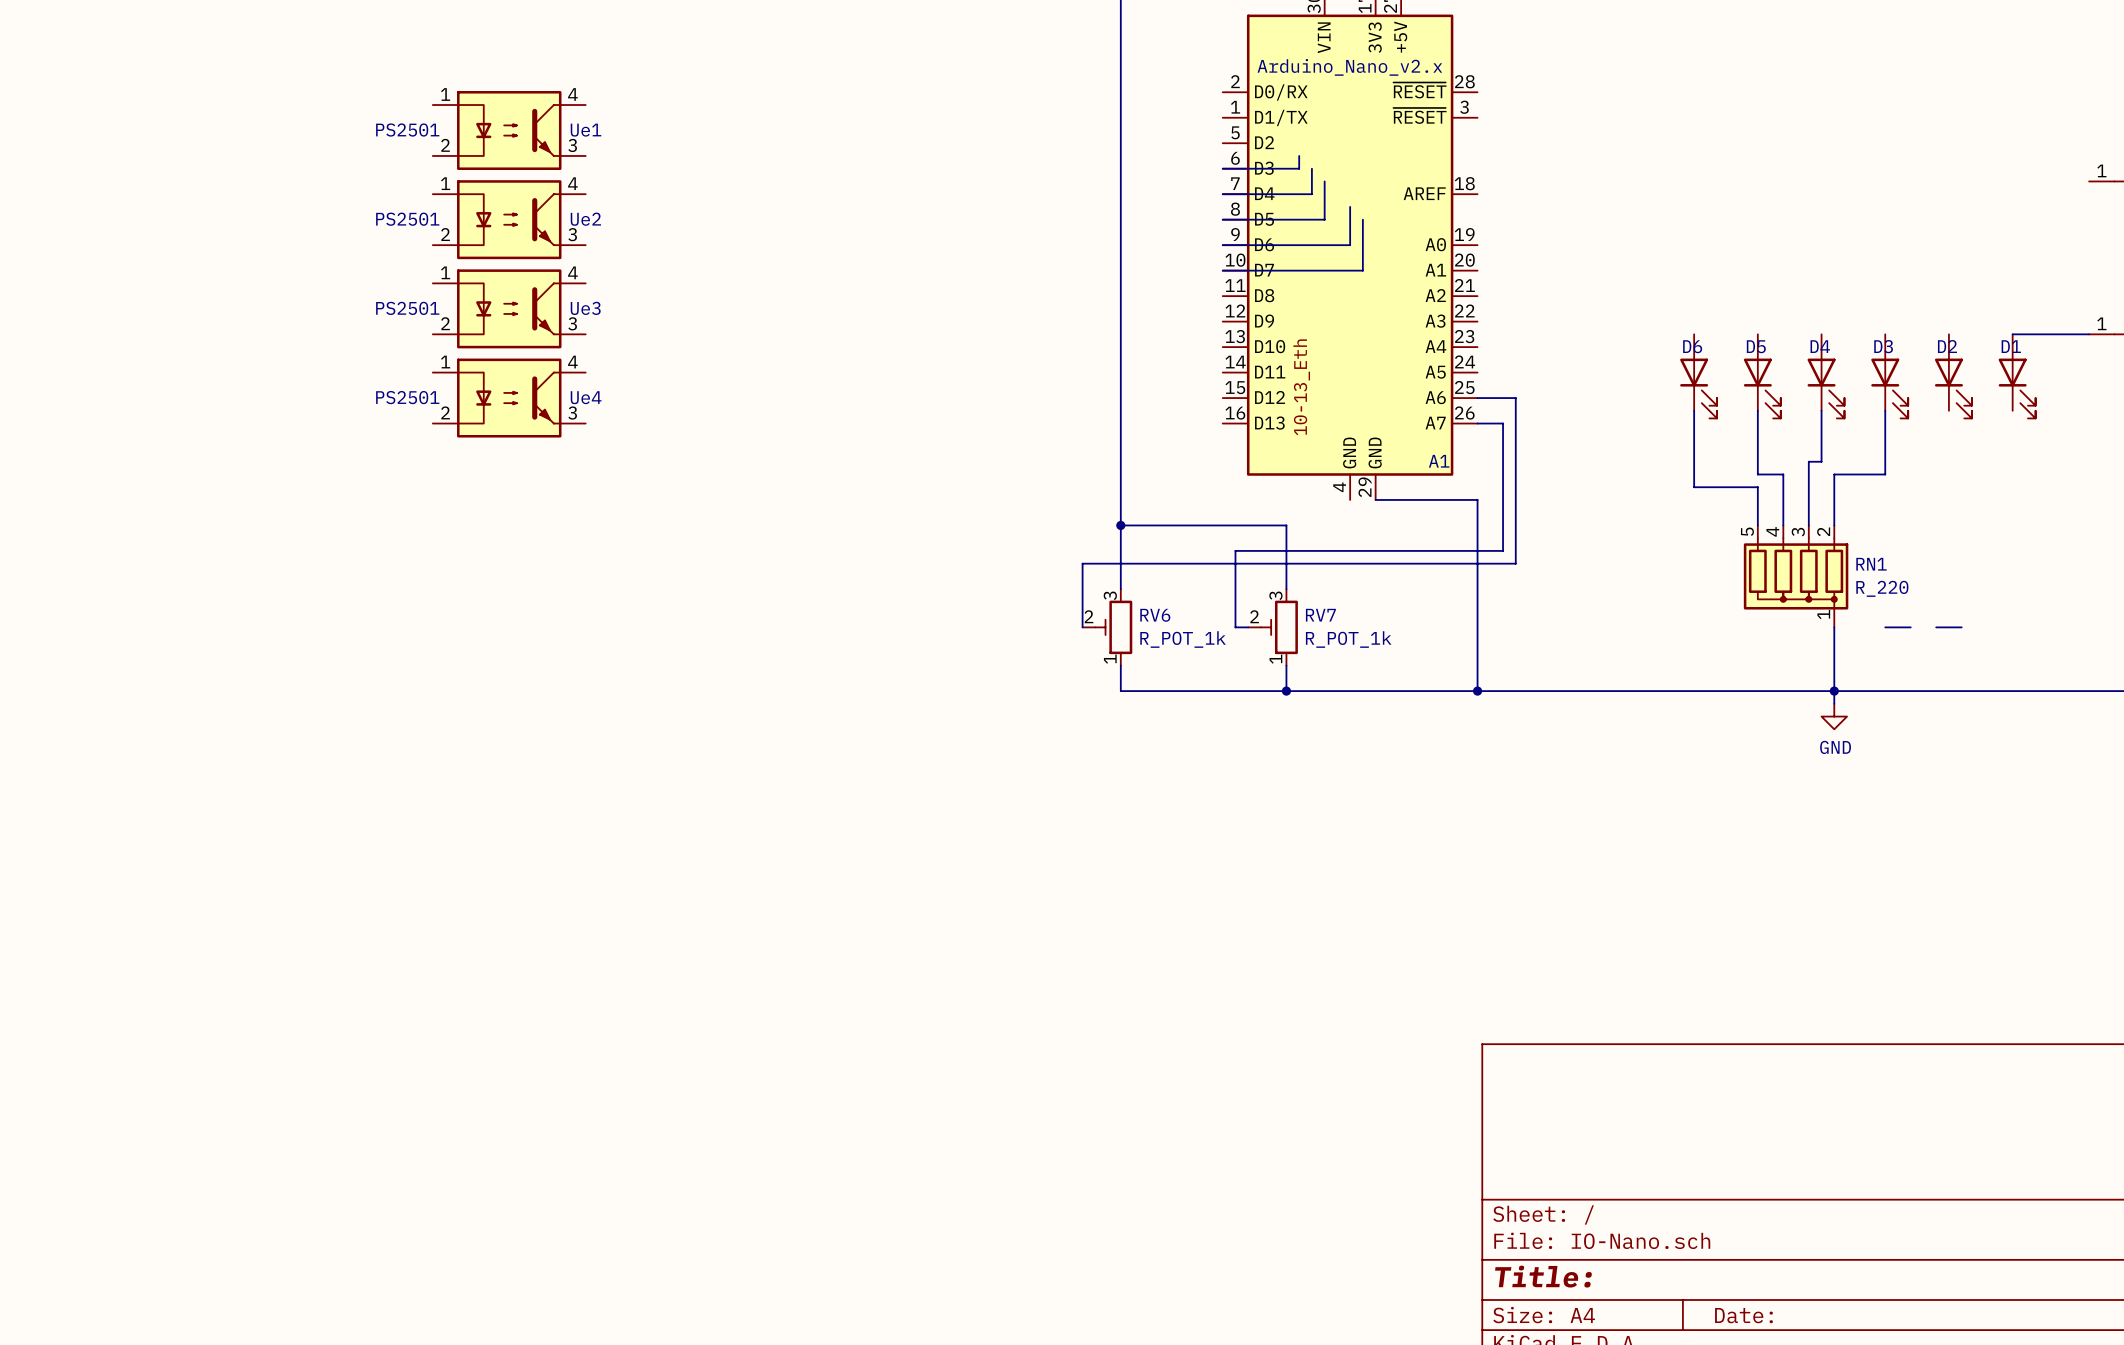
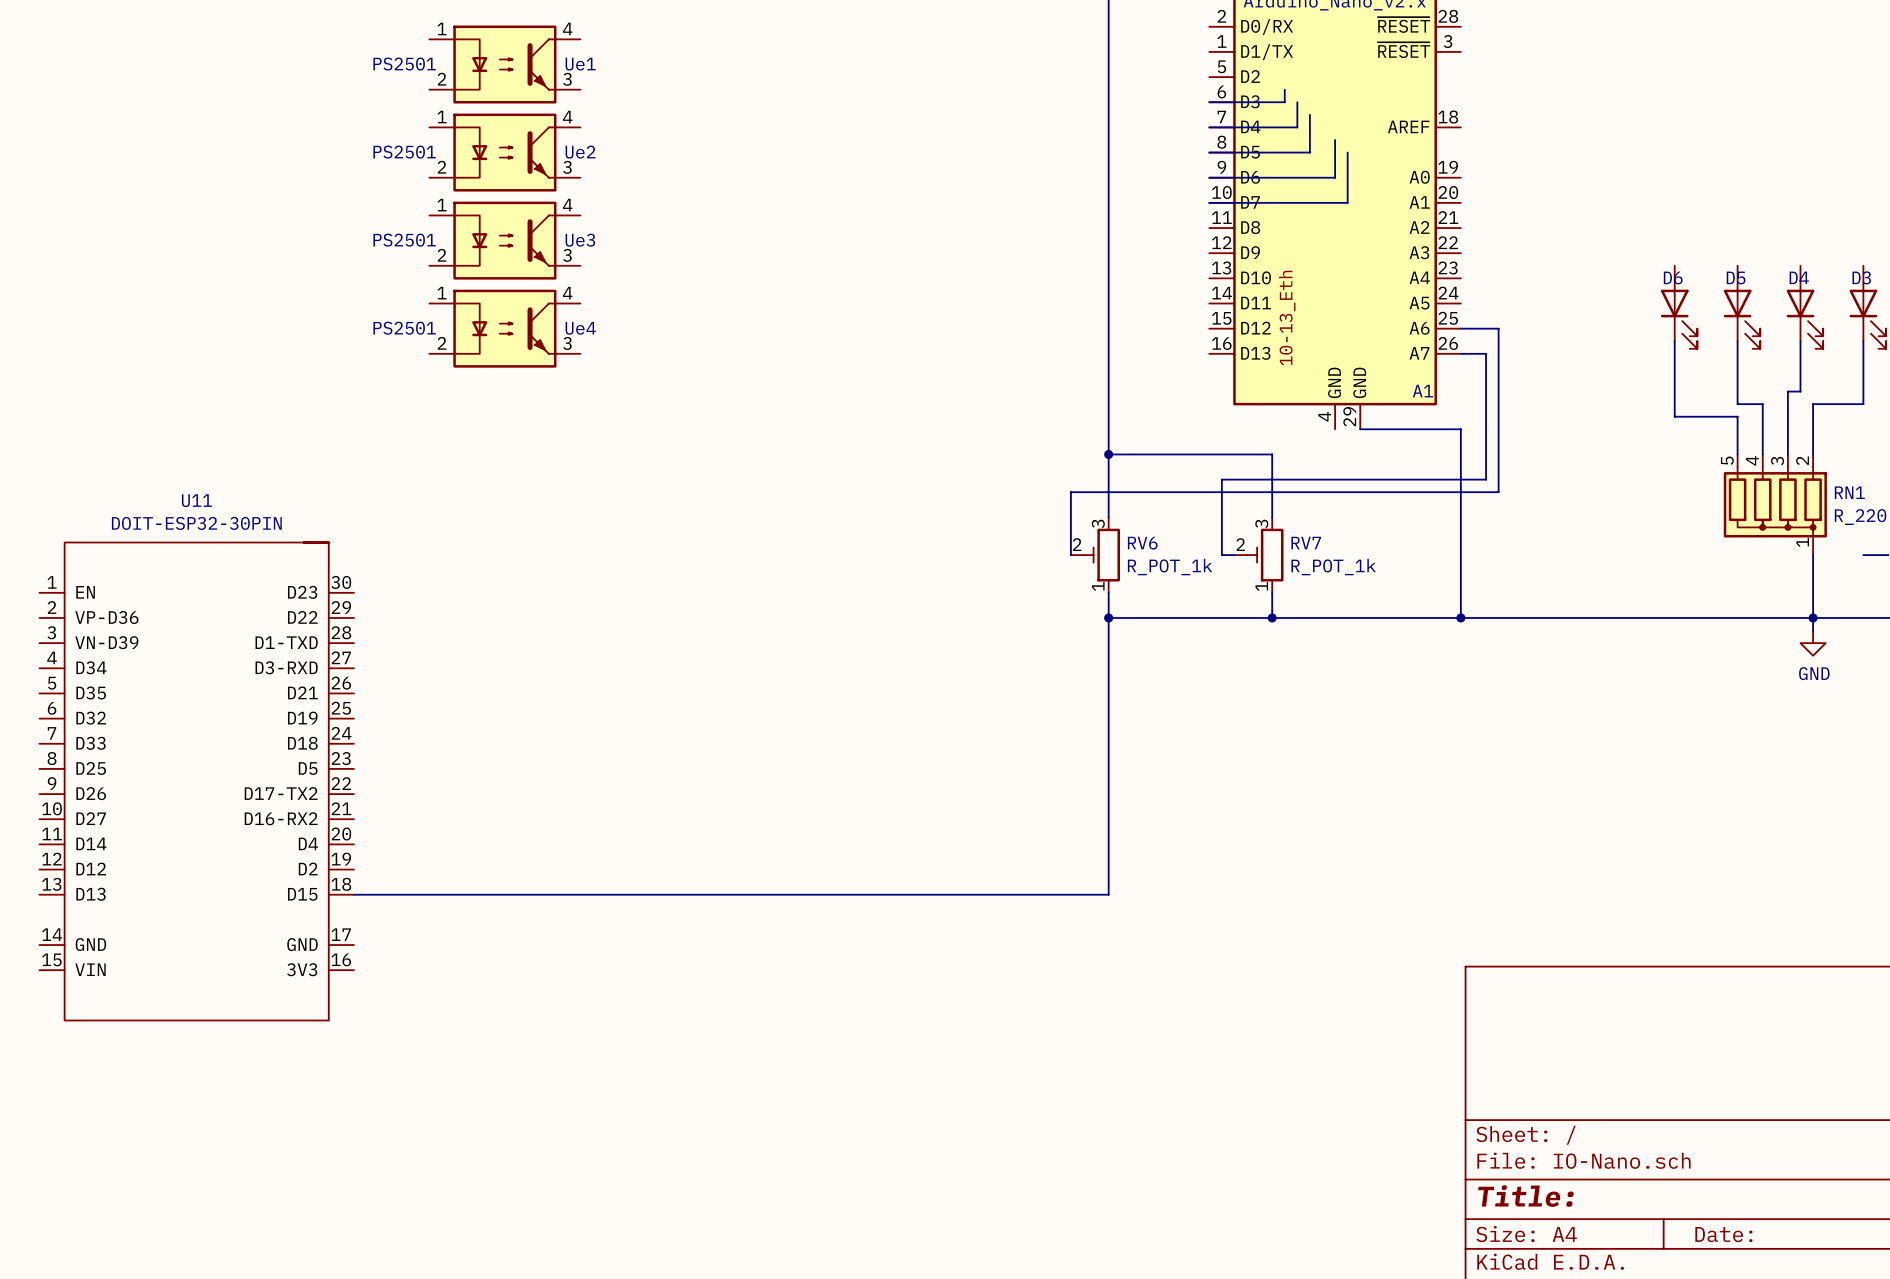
wire: none -> (1108, 617) (1108, 894) (353, 894)
junction: none -> (1108, 617)
U11: none -> DOIT-ESP32-30PIN (196, 781)

